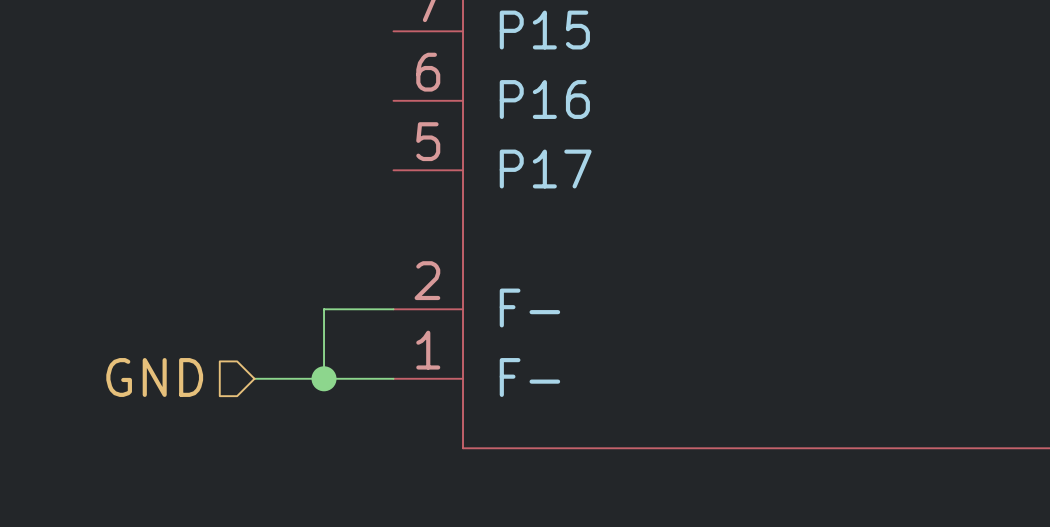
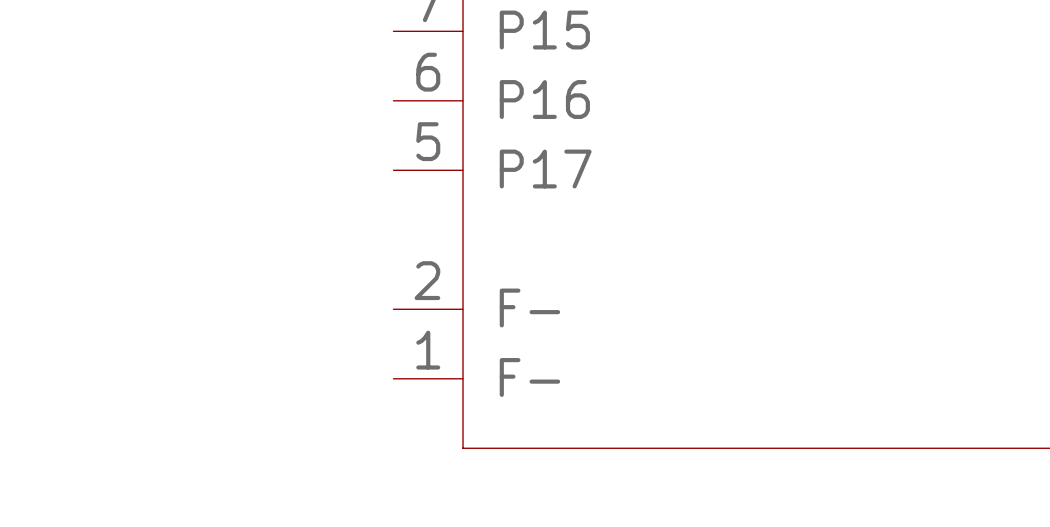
wire: (393, 309) (324, 309) (324, 378) -> none
hierarchical label: GND (154, 377) -> none
wire: (254, 378) (393, 378) -> none
junction: (324, 378) -> none

